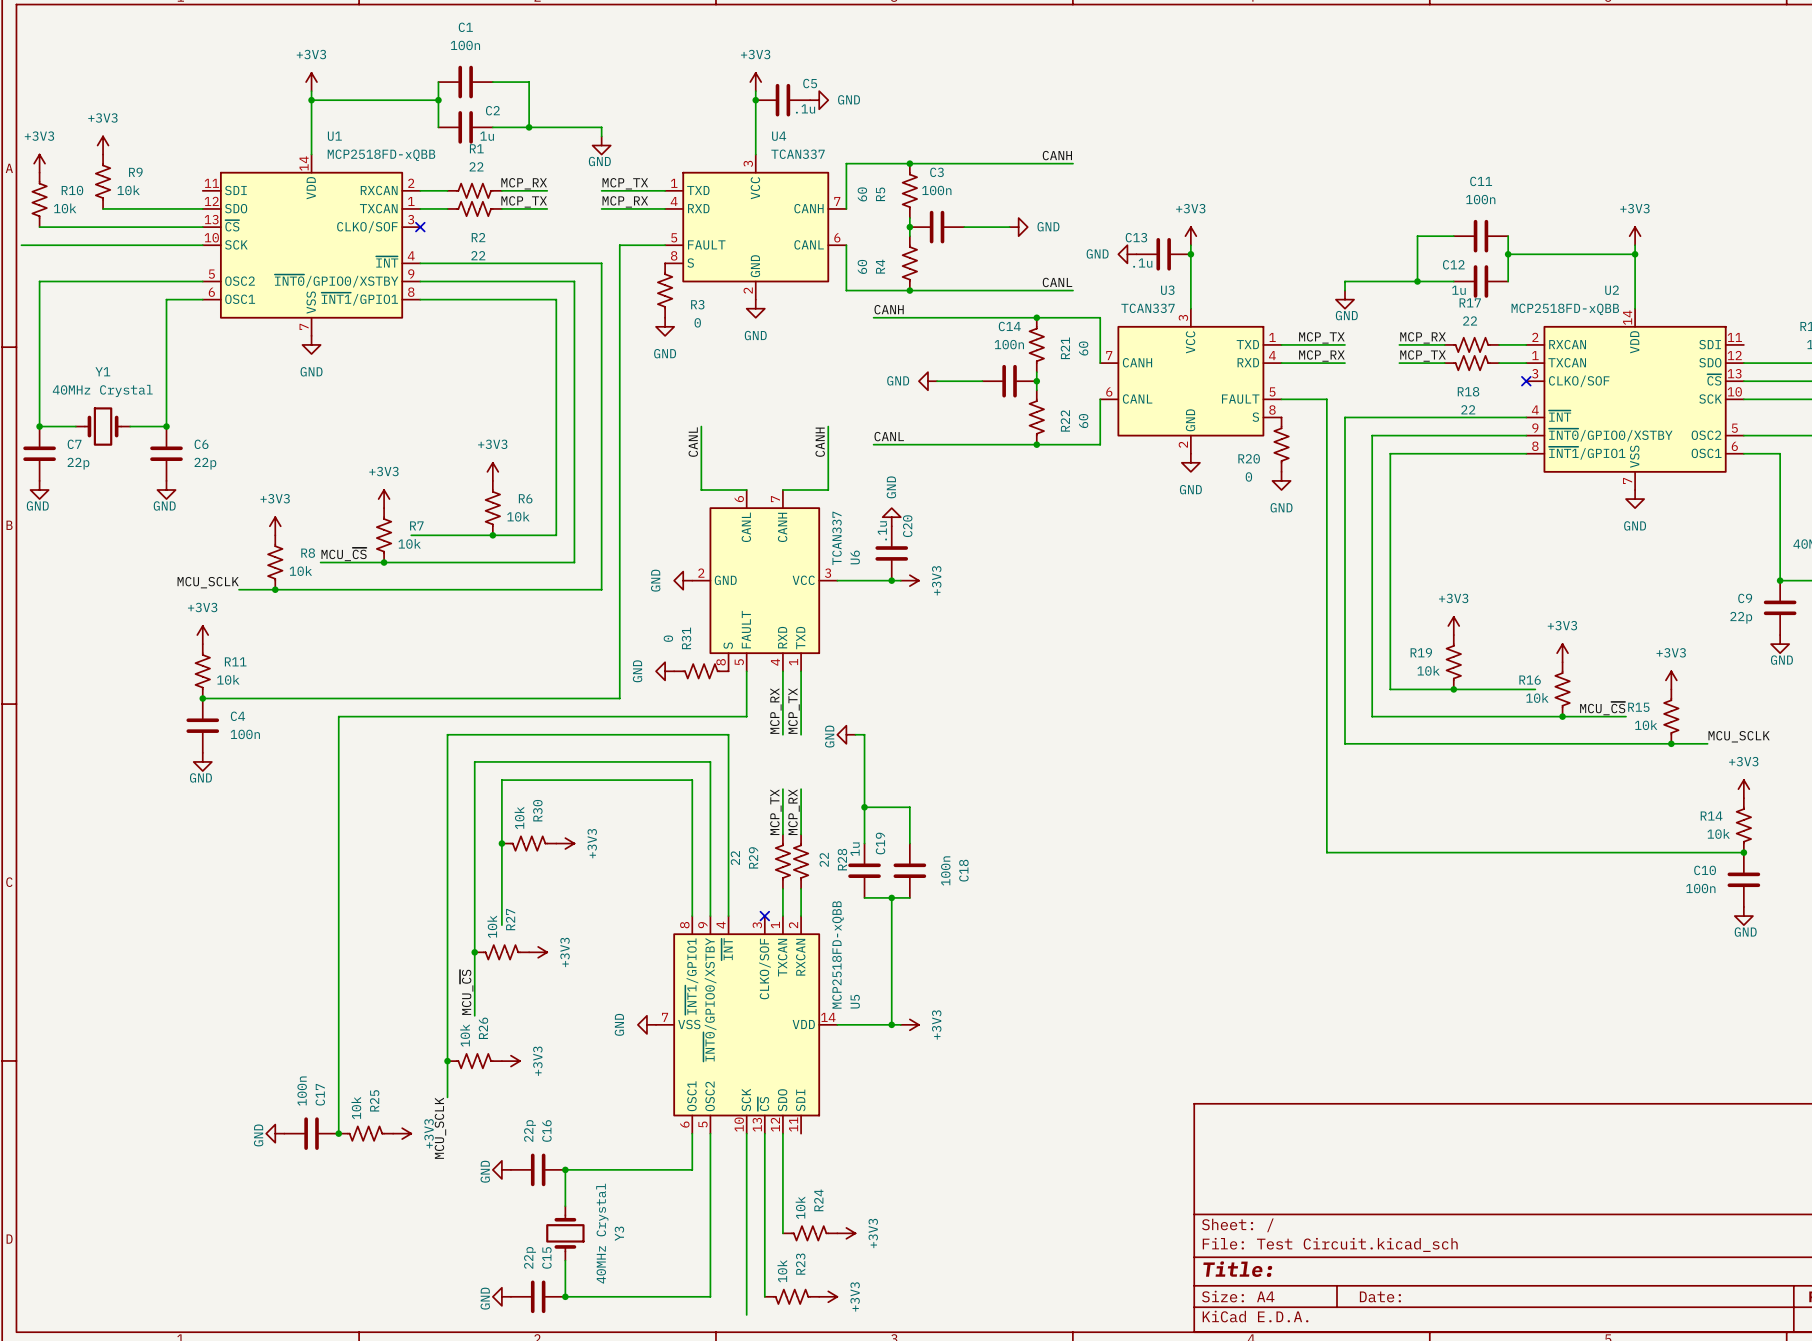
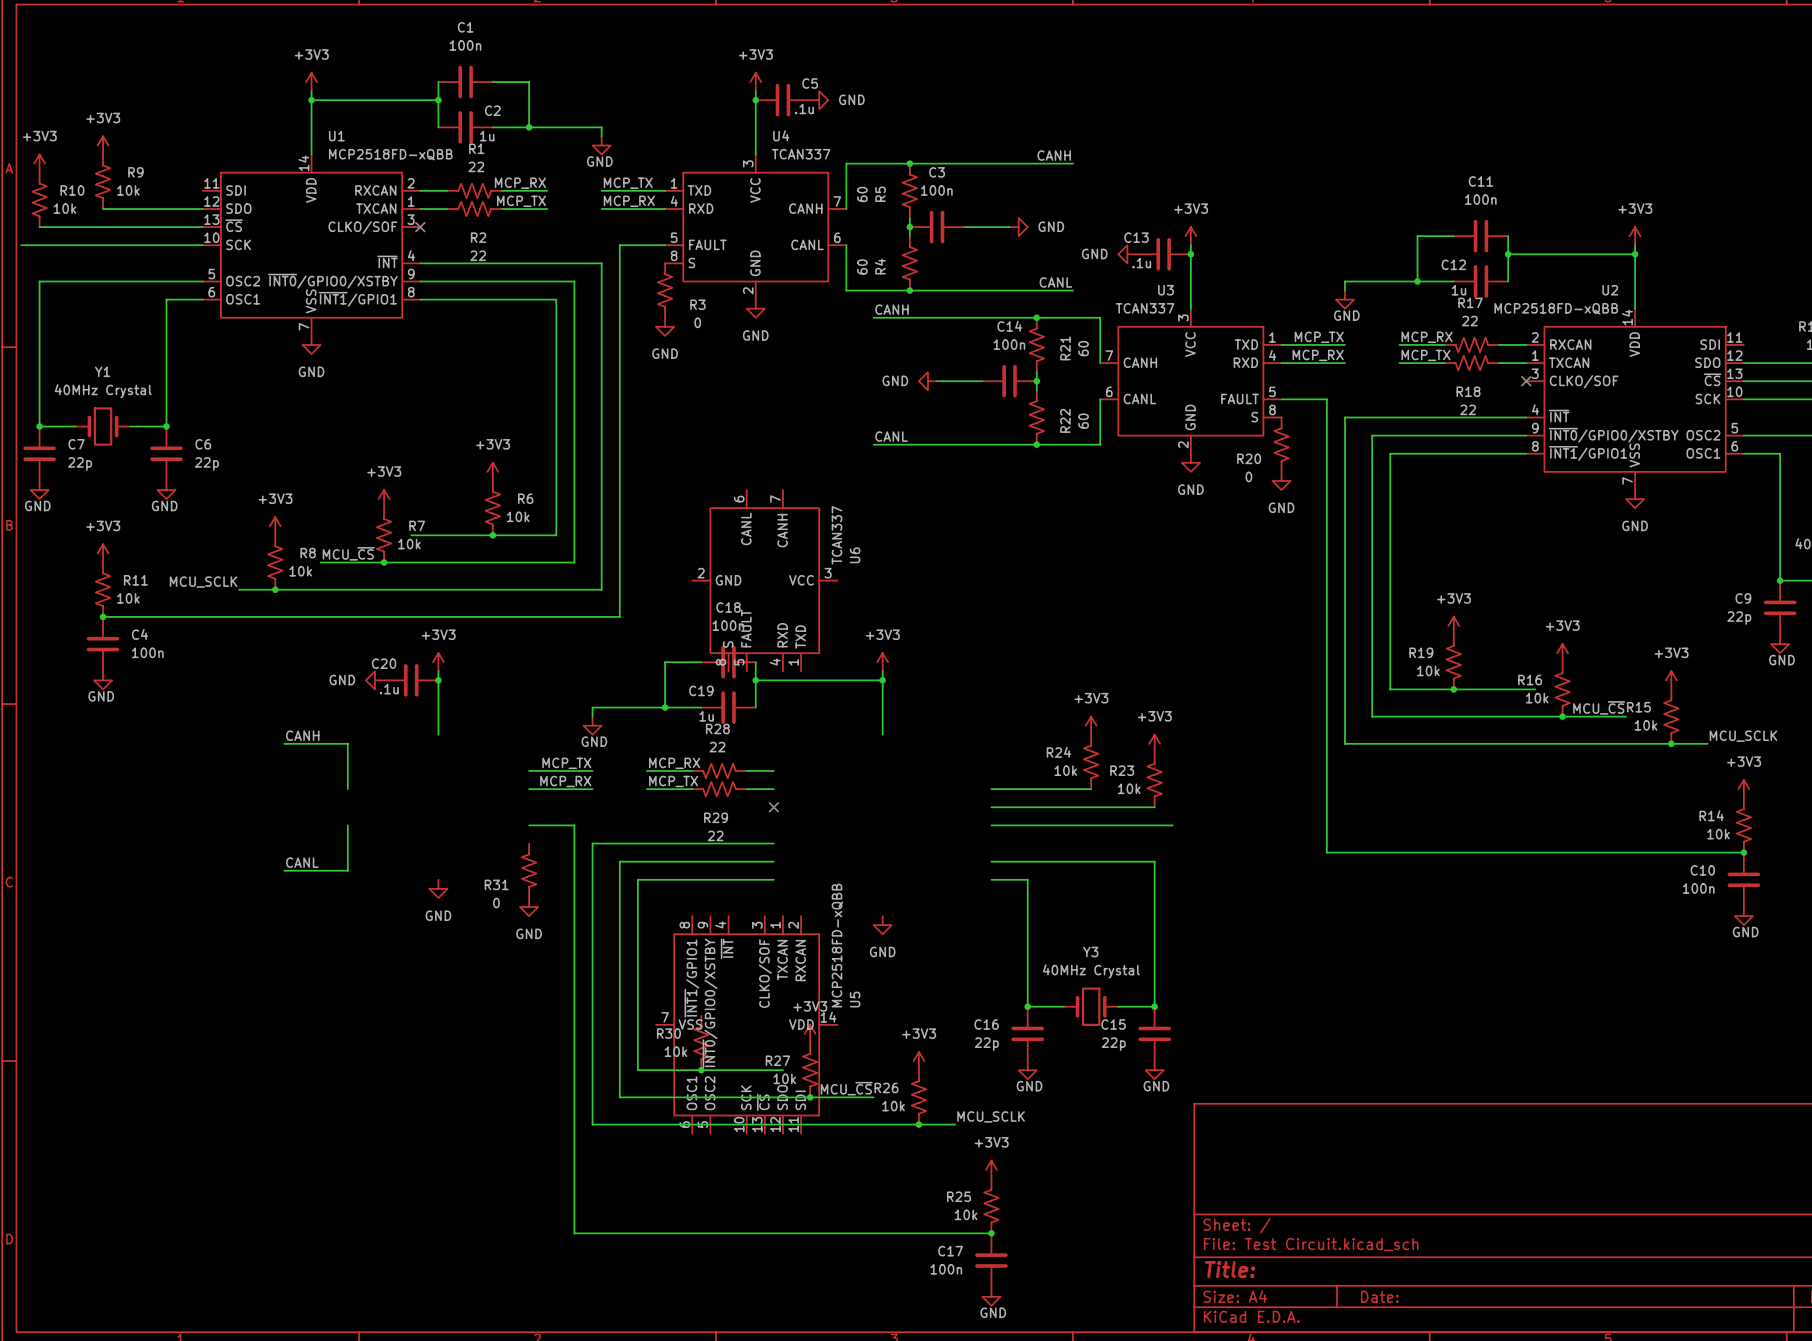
wire: (701, 426) (701, 489) (746, 489) -> none
wire: (828, 426) (828, 489) (782, 489) -> none
label: CANL (693, 442) -> none
label: CANH (820, 442) -> none
power symbol: GND (891, 517) -> none
C20 name position: C20 (907, 526) -> C20 (384, 663)
C20 value position: .1u (882, 530) -> .1u (389, 689)
power symbol: none -> +3V3 (103, 553)
C20 rotation: 0° (891, 553) -> 90° clockwise (411, 680)
C20 position: (891, 553) -> (411, 680)
power symbol: GND (683, 580) -> none
wire: (837, 580) (900, 580) -> none
junction: (891, 580) -> none
power symbol rotation: 0° (909, 580) -> 90° counterclockwise (882, 662)
power symbol position: +3V3 (909, 580) -> +3V3 (882, 662)
junction: none -> (103, 616)
wire: (619, 616) (619, 698) (202, 698) -> (619, 616) (103, 616)
power symbol: +3V3 (202, 635) -> none
R31 value position: 0 (668, 638) -> 0 (496, 903)
R31 name position: R31 (686, 638) -> R31 (496, 884)
power symbol: none -> +3V3 (438, 662)
wire: none -> (701, 662) (665, 662) (665, 707)
R11 position: (202, 671) -> (103, 589)
wire: none -> (438, 671) (438, 734)
power symbol: GND (665, 671) -> none
R31 rotation: 0° (701, 671) -> 90° clockwise (529, 870)
R31 position: (701, 671) -> (529, 870)
wire: (746, 671) (746, 716) (338, 716) (338, 1133) -> none
wire: (782, 671) (782, 734) -> none
wire: (801, 671) (801, 734) -> (882, 671) (882, 734)
power symbol: none -> GND (103, 680)
power symbol: none -> GND (375, 680)
junction: none -> (438, 680)
wire: none -> (755, 680) (882, 680)
junction: none -> (755, 680)
junction: none -> (882, 680)
junction: (202, 698) -> none
junction: none -> (665, 707)
wire: none -> (701, 707) (592, 707) (592, 716)
label: MCP_RX (775, 711) -> none
label: MCP_TX (794, 711) -> none
C4 position: (202, 725) -> (103, 644)
power symbol: none -> GND (592, 725)
power symbol: none -> +3V3 (1091, 725)
power symbol: GND (846, 734) -> none
wire: (855, 734) (864, 734) (864, 843) -> none
label: none -> CANH (302, 735)
wire: none -> (284, 743) (347, 743) (347, 789)
power symbol: none -> +3V3 (1154, 743)
power symbol: GND (202, 761) -> none
label: none -> MCP_TX (566, 763)
label: none -> MCP_RX (674, 763)
wire: none -> (529, 771) (592, 771)
wire: none -> (646, 771) (692, 771)
wire: none -> (746, 771) (773, 771)
label: none -> MCP_RX (565, 781)
label: none -> MCP_TX (673, 781)
wire: none -> (529, 789) (592, 789)
wire: none -> (646, 789) (692, 789)
wire: none -> (746, 789) (773, 789)
wire: (782, 789) (782, 834) -> (755, 662) (755, 707)
wire: (801, 789) (801, 834) -> none
wire: none -> (991, 789) (1091, 789)
no-connect mark: none -> (773, 807)
wire: (864, 807) (909, 807) (909, 843) -> none
junction: (864, 807) -> none
wire: none -> (991, 807) (1154, 807)
R30 name position: R30 (537, 810) -> R30 (668, 1033)
label: MCP_TX (775, 812) -> none
label: MCP_RX (794, 812) -> none
R30 value position: 10k (519, 817) -> 10k (675, 1051)
wire: none -> (347, 825) (347, 870) (284, 870)
wire: none -> (529, 825) (574, 825) (574, 1233) (991, 1233)
wire: none -> (991, 825) (1172, 825)
junction: (501, 843) -> none
R30 rotation: 0° (529, 843) -> 90° clockwise (701, 1042)
R30 position: (529, 843) -> (701, 1042)
power symbol: +3V3 (565, 843) -> none
wire: none -> (773, 843) (592, 843) (592, 1124) (955, 1124)
C19 name position: C19 (880, 843) -> C19 (701, 690)
C19 value position: 1u (855, 849) -> 1u (706, 716)
R29 name position: R29 (753, 857) -> R29 (716, 817)
R29 value position: 22 (735, 858) -> 22 (715, 835)
R28 value position: 22 (824, 859) -> 22 (717, 747)
R28 name position: R28 (842, 859) -> R28 (717, 728)
wire: none -> (773, 861) (619, 861) (619, 1097) (873, 1097)
R29 rotation: 0° (782, 861) -> 90° clockwise (719, 789)
R29 position: (782, 861) -> (719, 789)
R28 rotation: 0° (801, 861) -> 90° clockwise (719, 771)
R28 position: (801, 861) -> (719, 771)
wire: none -> (991, 861) (1154, 861) (1154, 1006) (1118, 1006)
label: none -> CANL (302, 862)
C19 rotation: 0° (864, 870) -> 90° clockwise (728, 707)
C19 position: (864, 870) -> (728, 707)
C18 rotation: 0° (909, 870) -> 90° clockwise (728, 662)
C18 position: (909, 870) -> (728, 662)
C18 value position: 100n (945, 870) -> 100n (728, 625)
C18 name position: C18 (963, 870) -> C18 (728, 607)
wire: none -> (773, 879) (637, 879) (637, 1070) (782, 1070)
wire: none -> (991, 879) (1027, 879) (1027, 1006) (1063, 1006)
power symbol: none -> GND (438, 888)
wire: (782, 888) (782, 916) -> none
wire: (801, 888) (801, 916) -> none
wire: (864, 897) (909, 897) -> none
wire: (891, 897) (891, 1024) -> none
junction: (891, 897) -> none
power symbol: none -> GND (529, 907)
wire: (692, 916) (692, 780) (501, 780) (501, 925) -> none
wire: (710, 916) (710, 761) (474, 761) (474, 1015) -> none
wire: (728, 916) (728, 734) (447, 734) (447, 1097) -> none
no-connect mark: (764, 916) -> none
R27 name position: R27 (510, 919) -> R27 (777, 1060)
power symbol: none -> GND (882, 925)
R27 value position: 10k (492, 926) -> 10k (784, 1078)
junction: (474, 952) -> none
R27 rotation: 0° (501, 952) -> 90° clockwise (810, 1070)
R27 position: (501, 952) -> (810, 1070)
power symbol: +3V3 (538, 952) -> none
label: MCU_~{CS} (466, 992) -> none
junction: none -> (1027, 1006)
junction: none -> (1154, 1006)
power symbol: GND (646, 1024) -> none
wire: (837, 1024) (900, 1024) -> none
junction: (891, 1024) -> none
power symbol rotation: 0° (909, 1024) -> 90° counterclockwise (918, 1061)
power symbol position: +3V3 (909, 1024) -> +3V3 (918, 1061)
R26 name position: R26 (483, 1028) -> R26 (886, 1087)
power symbol: none -> +3V3 (810, 1033)
R26 value position: 10k (465, 1035) -> 10k (893, 1106)
junction: (447, 1061) -> none
R26 rotation: 0° (474, 1061) -> 90° clockwise (918, 1097)
R26 position: (474, 1061) -> (918, 1097)
power symbol: +3V3 (510, 1061) -> none
junction: none -> (701, 1070)
power symbol: none -> GND (1027, 1070)
power symbol: none -> GND (1154, 1070)
label: none -> MCU_~{CS} (846, 1088)
C17 value position: 100n (302, 1091) -> 100n (946, 1269)
C17 name position: C17 (320, 1094) -> C17 (950, 1251)
junction: none -> (810, 1097)
R25 name position: R25 (374, 1100) -> R25 (959, 1196)
R25 value position: 10k (356, 1108) -> 10k (966, 1214)
label: none -> MCU_SCLK (991, 1116)
junction: none -> (918, 1124)
label: MCU_SCLK (440, 1128) -> none
C16 value position: 22p (529, 1130) -> 22p (986, 1044)
C16 name position: C16 (546, 1130) -> C16 (986, 1024)
power symbol: GND (275, 1133) -> none
C17 rotation: 0° (311, 1133) -> 90° clockwise (991, 1260)
C17 position: (311, 1133) -> (991, 1260)
junction: (338, 1133) -> none
R25 rotation: 0° (365, 1133) -> 90° clockwise (991, 1206)
R25 position: (365, 1133) -> (991, 1206)
power symbol: +3V3 (402, 1133) -> none
wire: (692, 1133) (692, 1169) (565, 1169) (565, 1206) -> none
wire: (710, 1133) (710, 1296) (565, 1296) (565, 1260) -> none
wire: (746, 1133) (746, 1314) -> none
wire: (764, 1133) (764, 1296) -> none
wire: (782, 1133) (782, 1233) -> none
power symbol: GND (501, 1169) -> none
C16 rotation: 0° (538, 1169) -> 90° clockwise (1027, 1033)
C16 position: (538, 1169) -> (1027, 1033)
junction: (565, 1169) -> none
power symbol: none -> +3V3 (991, 1169)
R24 name position: R24 (818, 1200) -> R24 (1058, 752)
R24 value position: 10k (800, 1207) -> 10k (1065, 770)
Y3 rotation: 0° (565, 1233) -> 90° clockwise (1091, 1006)
Y3 position: (565, 1233) -> (1091, 1006)
Y3 value position: 40MHz Crystal (602, 1233) -> 40MHz Crystal (1091, 971)
Y3 name position: Y3 (619, 1233) -> Y3 (1090, 951)
R24 rotation: 0° (810, 1233) -> 90° clockwise (1091, 761)
R24 position: (810, 1233) -> (1091, 761)
power symbol: +3V3 (846, 1233) -> none
junction: none -> (991, 1233)
C15 value position: 22p (529, 1257) -> 22p (1113, 1044)
C15 name position: C15 (546, 1257) -> C15 (1113, 1024)
R23 name position: R23 (800, 1264) -> R23 (1122, 770)
R23 value position: 10k (782, 1271) -> 10k (1129, 788)
power symbol: GND (501, 1296) -> none
C15 rotation: 0° (538, 1296) -> 90° clockwise (1154, 1033)
C15 position: (538, 1296) -> (1154, 1033)
junction: (565, 1296) -> none
R23 rotation: 0° (792, 1296) -> 90° clockwise (1154, 780)
R23 position: (792, 1296) -> (1154, 780)
power symbol: +3V3 (828, 1296) -> none
power symbol: none -> GND (991, 1296)

